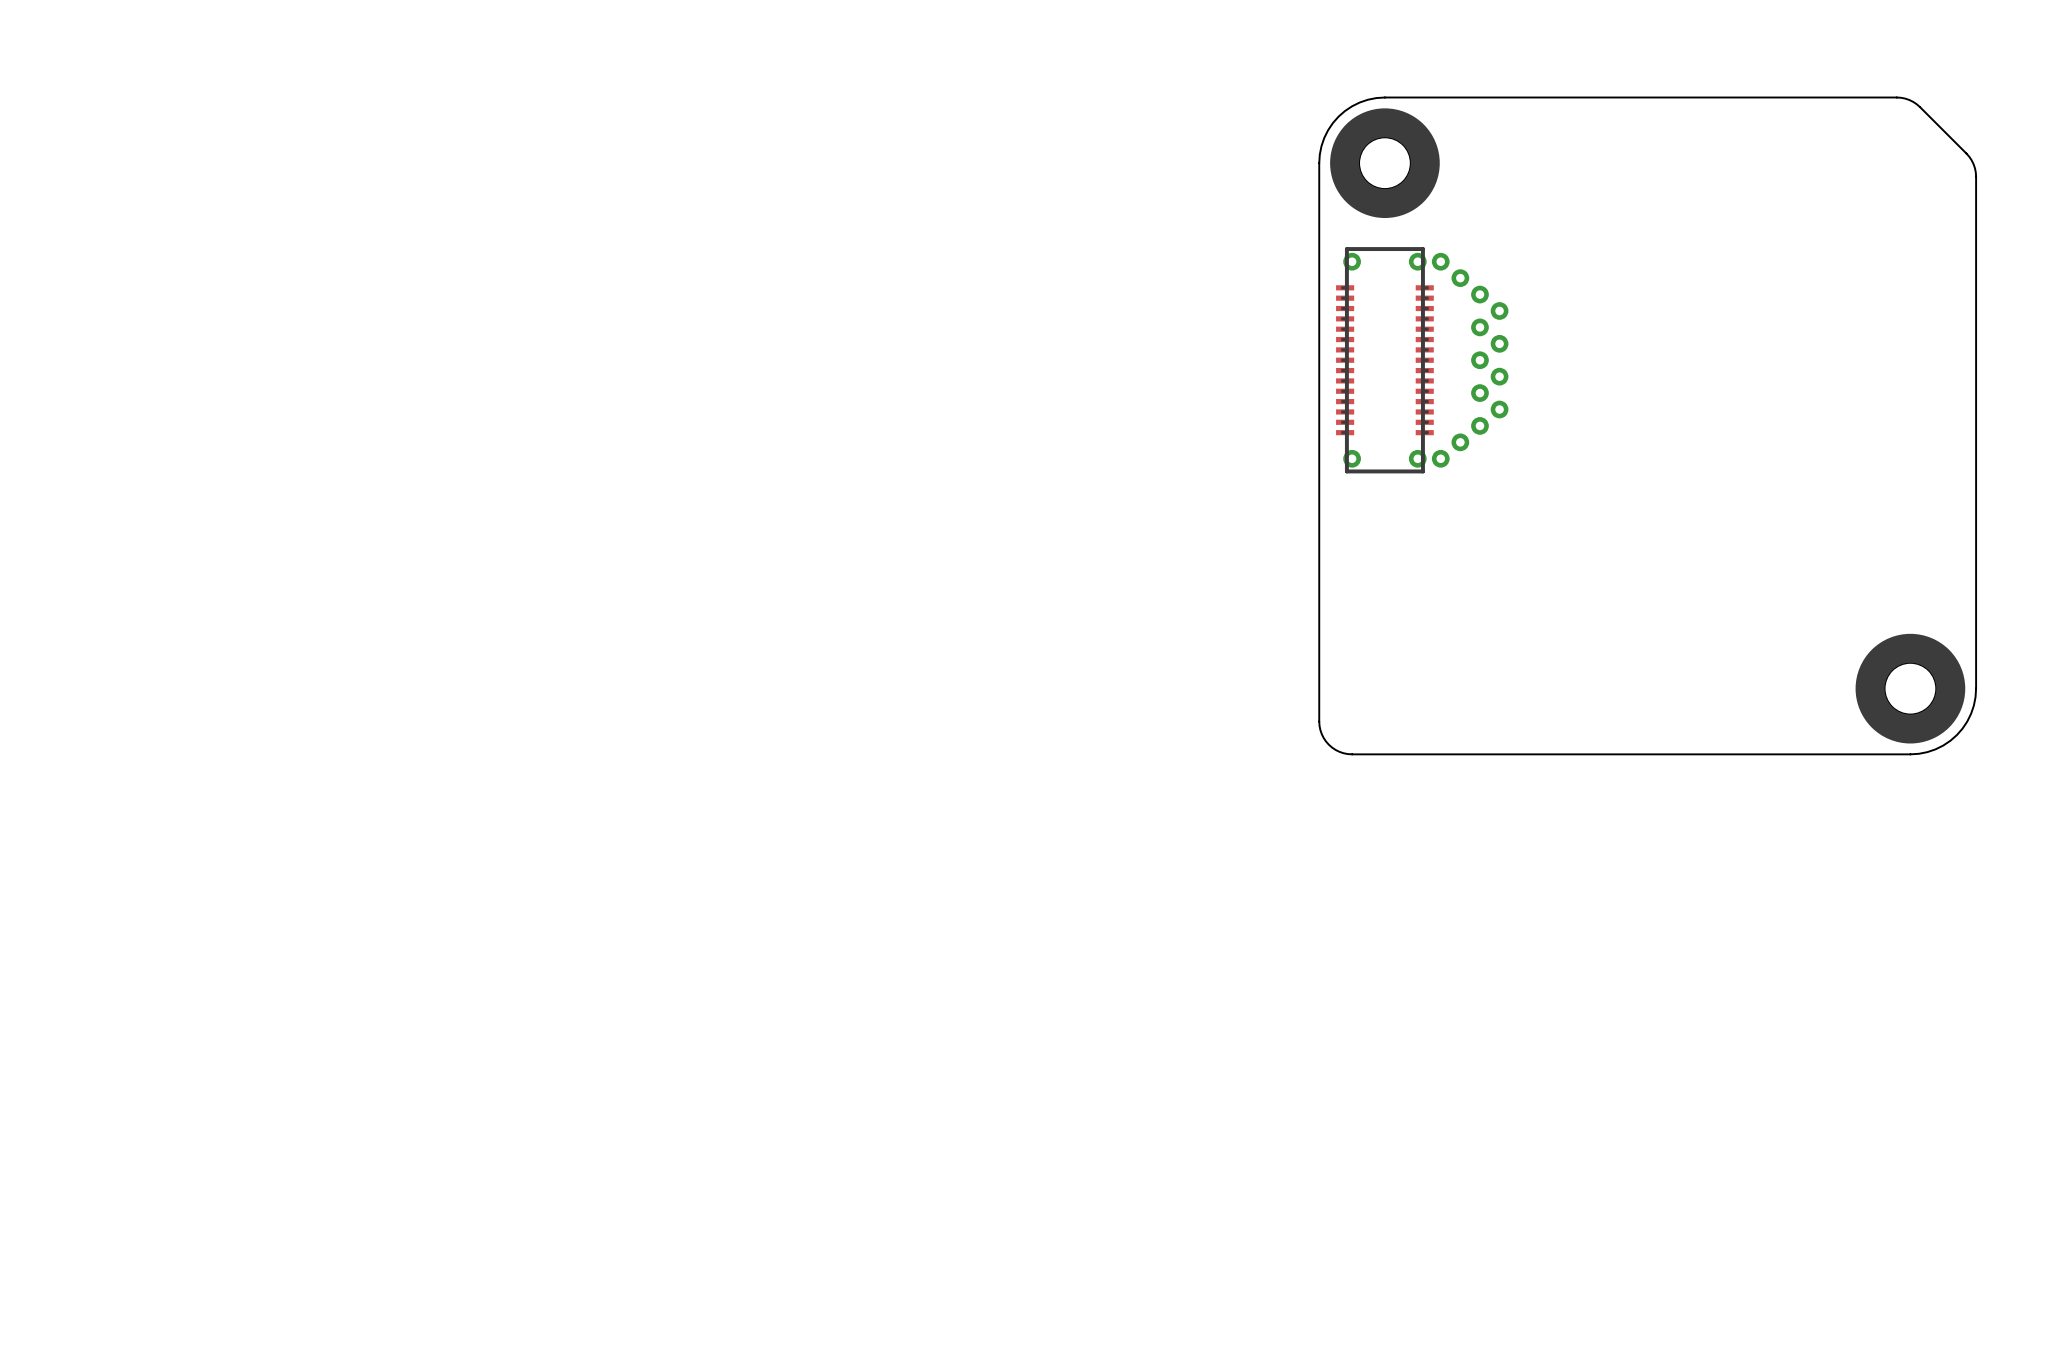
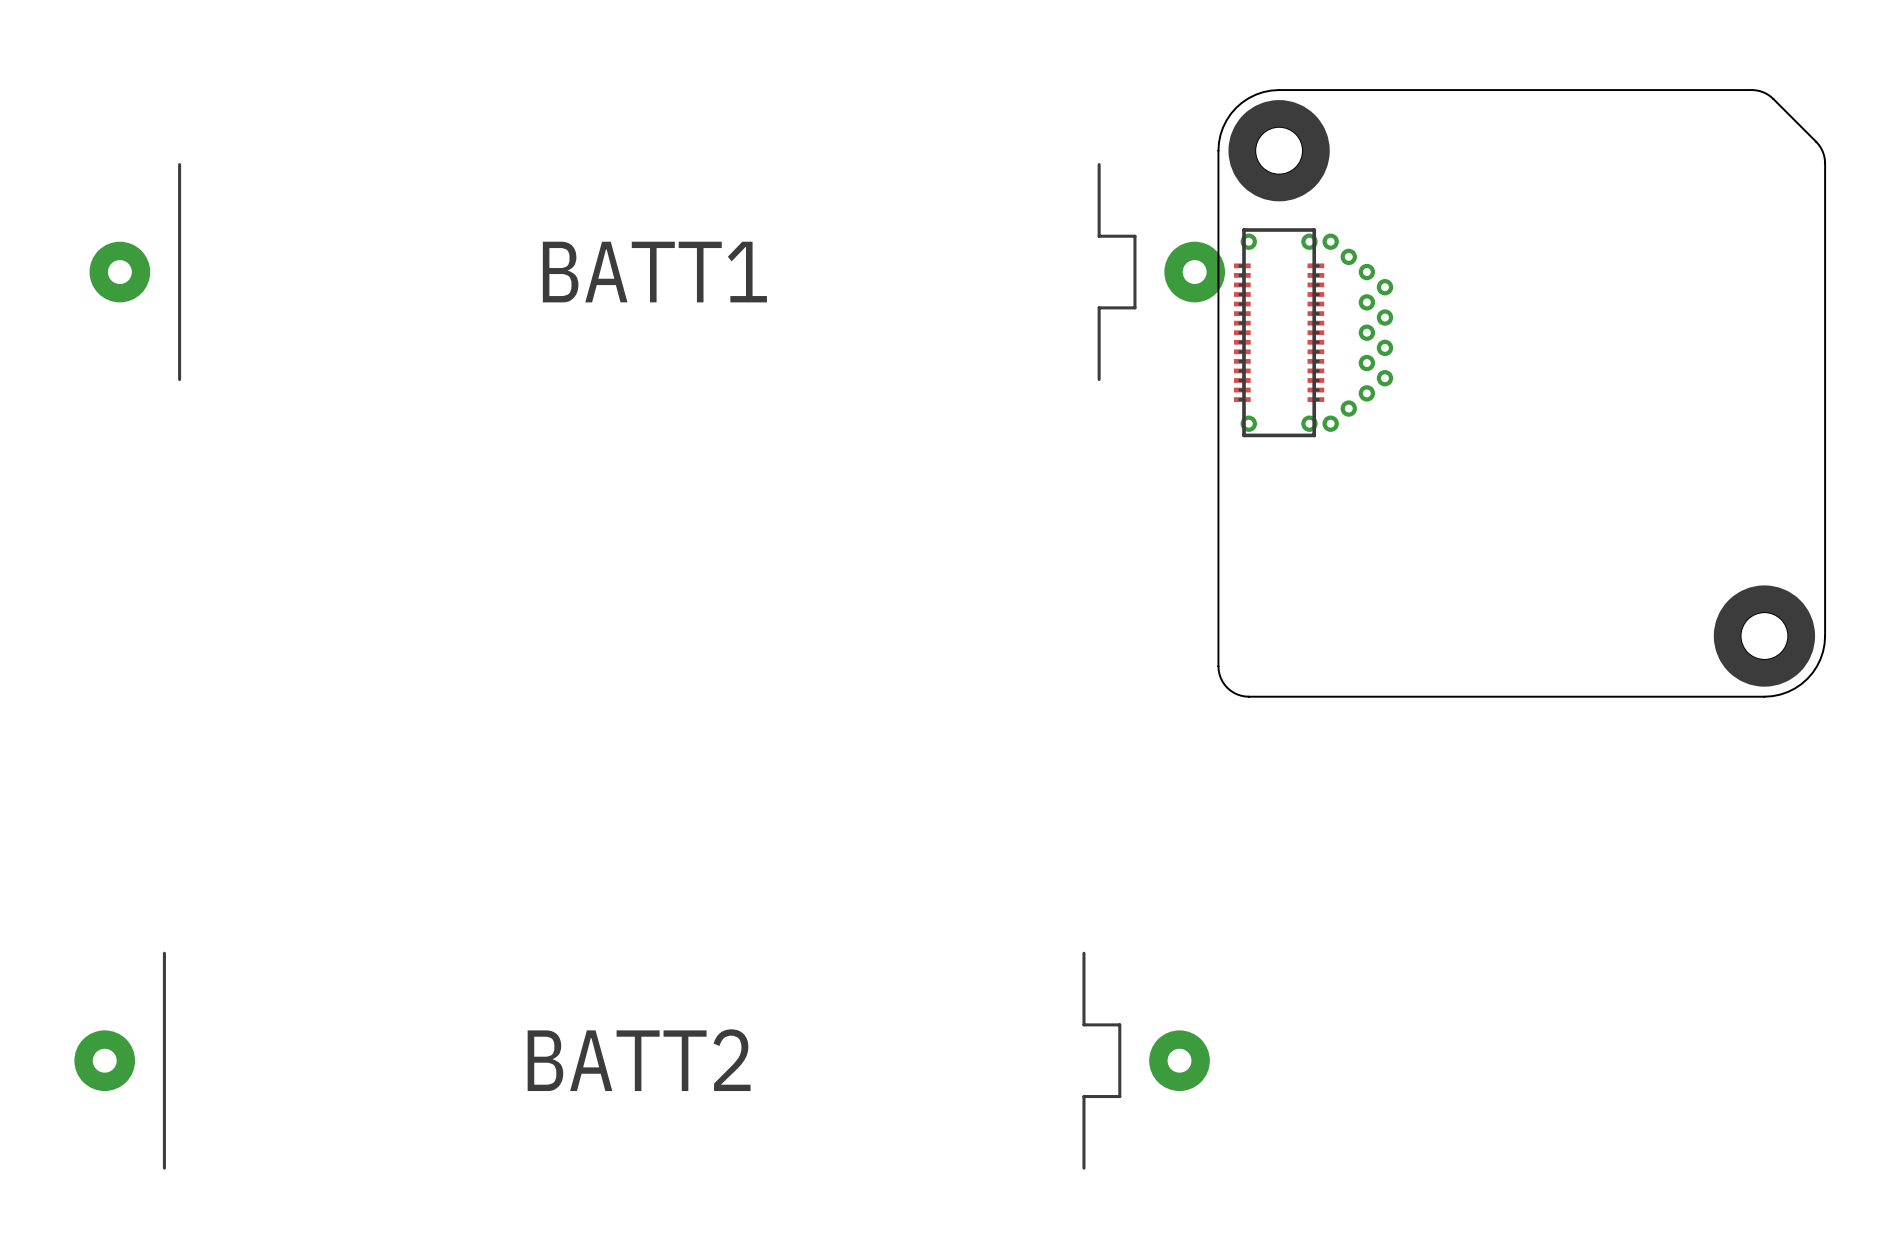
BATT1: none -> (657, 272)
BATT2: none -> (642, 1060)

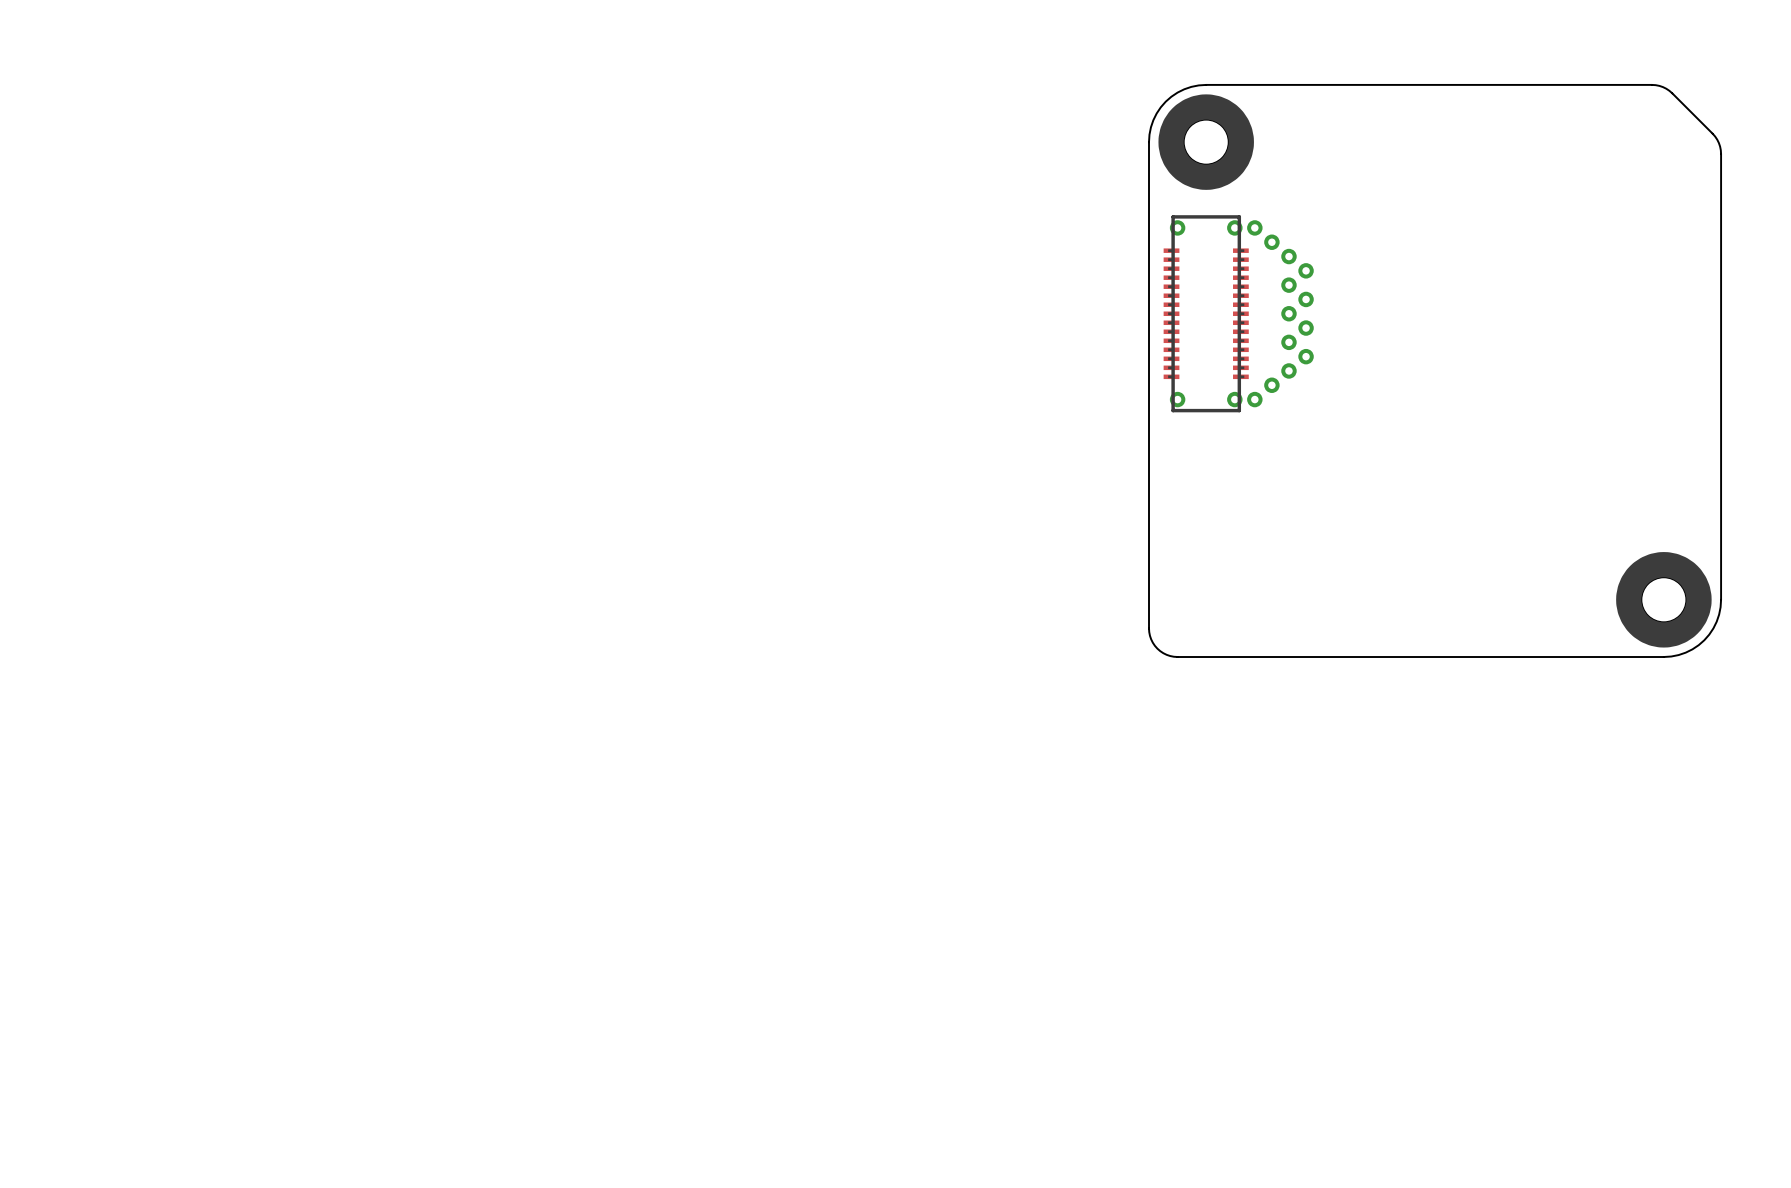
BATT1: (657, 272) -> none
BATT2: (642, 1060) -> none

